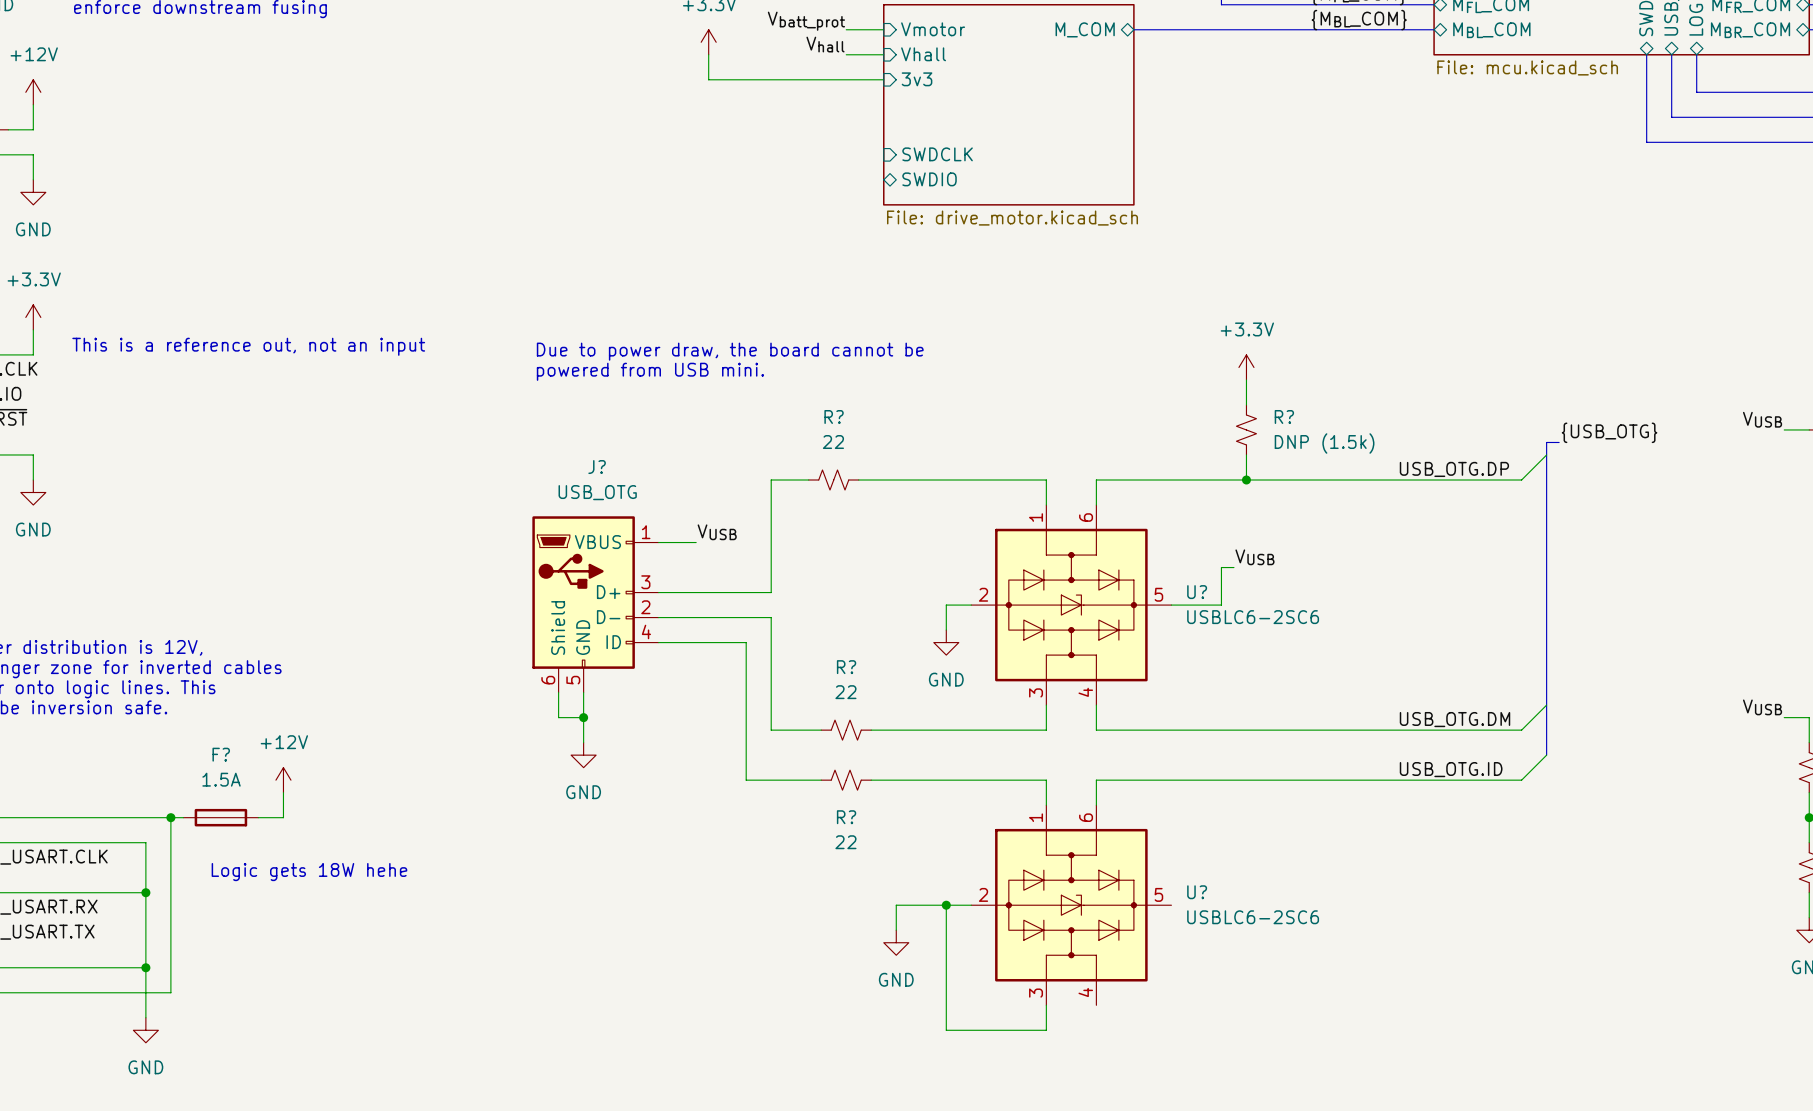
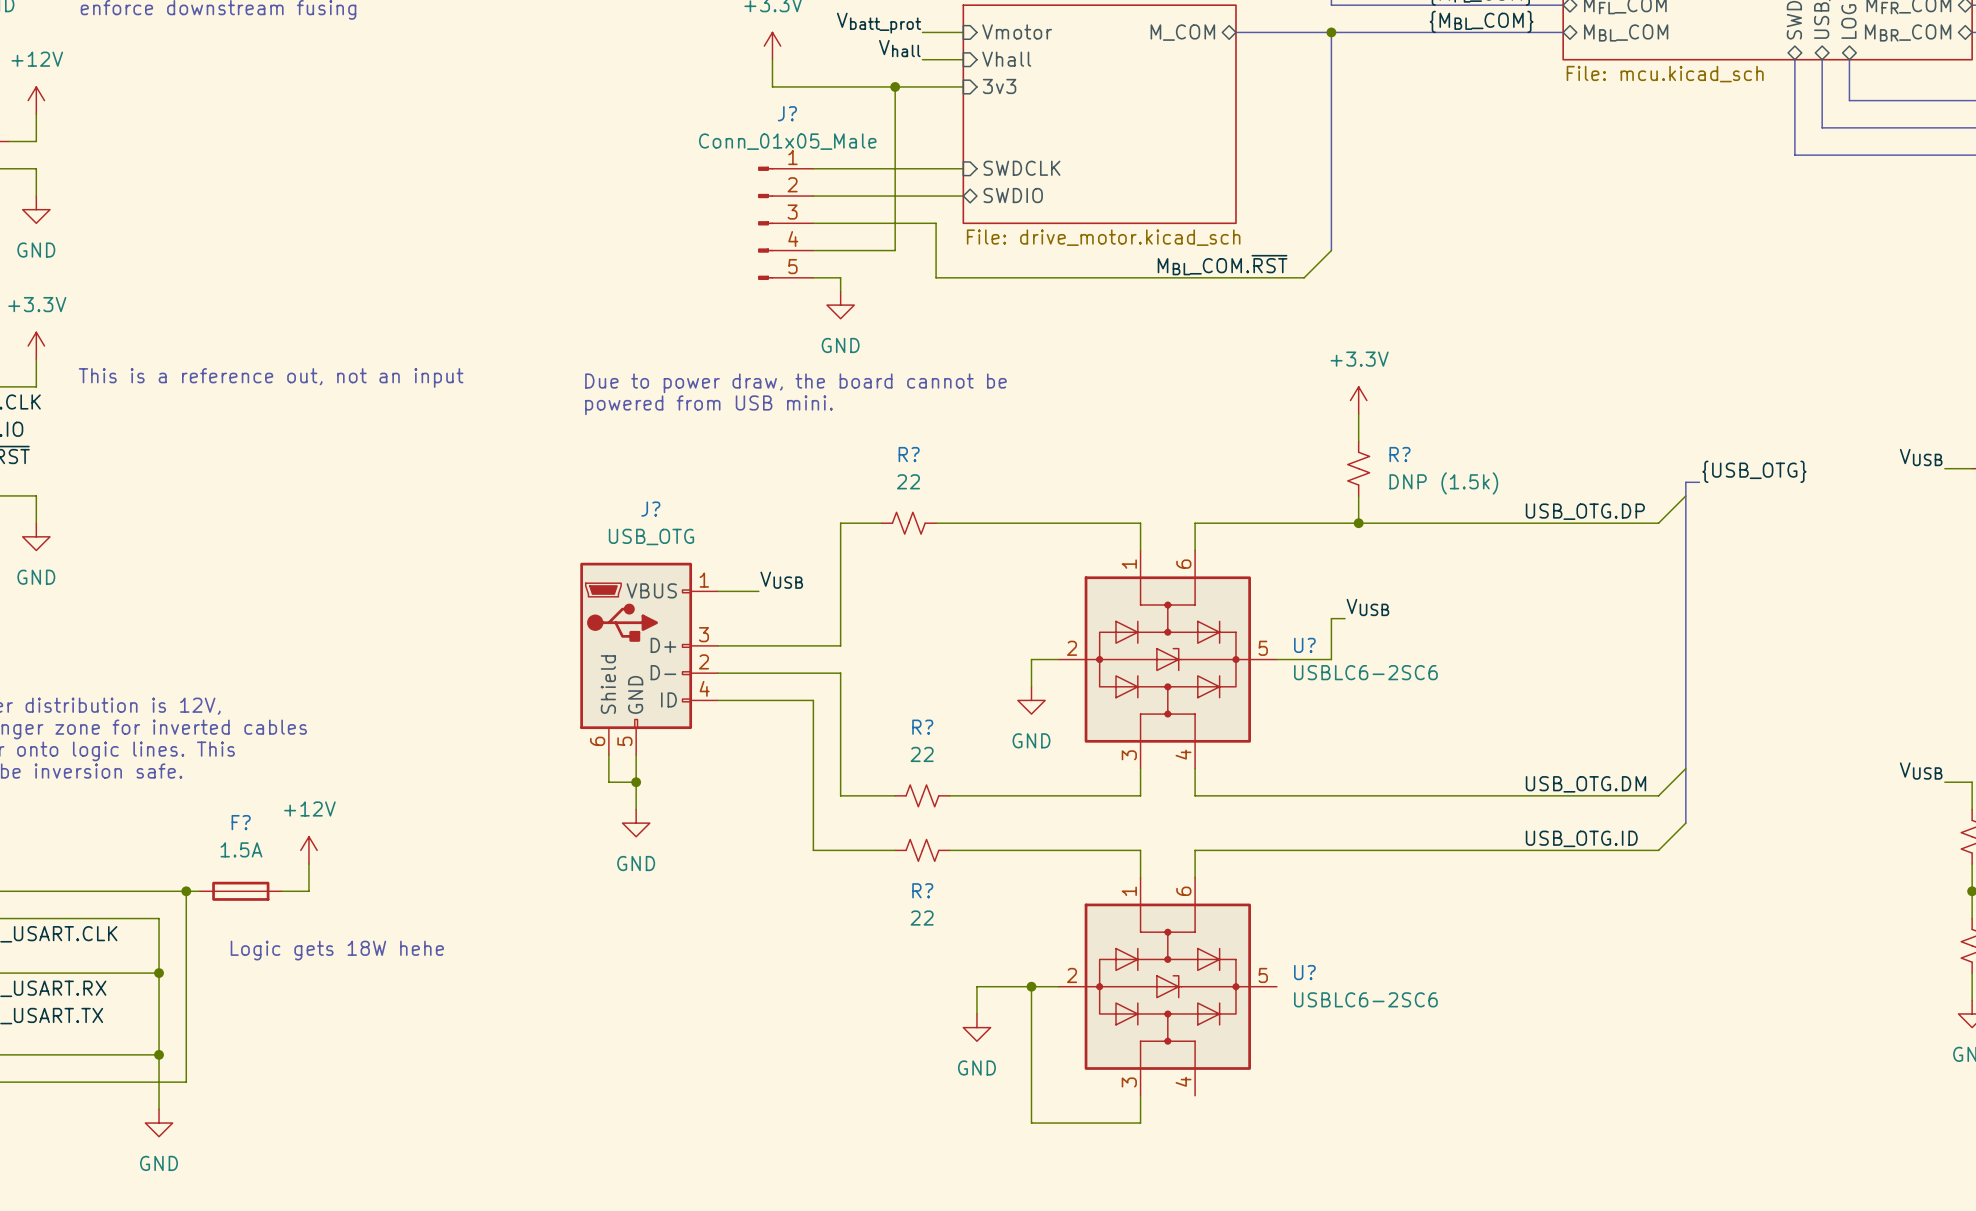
bus: none -> (1331, 32) (1331, 250)
junction: none -> (1331, 32)
wire: none -> (895, 86) (895, 250) (813, 250)
junction: none -> (895, 86)
wire: none -> (813, 168) (963, 168)
wire: none -> (813, 196) (963, 196)
J?: none -> Conn_01x05_Male (785, 223)
wire: none -> (813, 223) (936, 223) (936, 277) (1304, 277) (1331, 250)
label: none -> MBL_COM.~{RST} (1222, 265)
wire: none -> (813, 277) (840, 277) (840, 291)
power symbol: none -> GND (840, 305)

